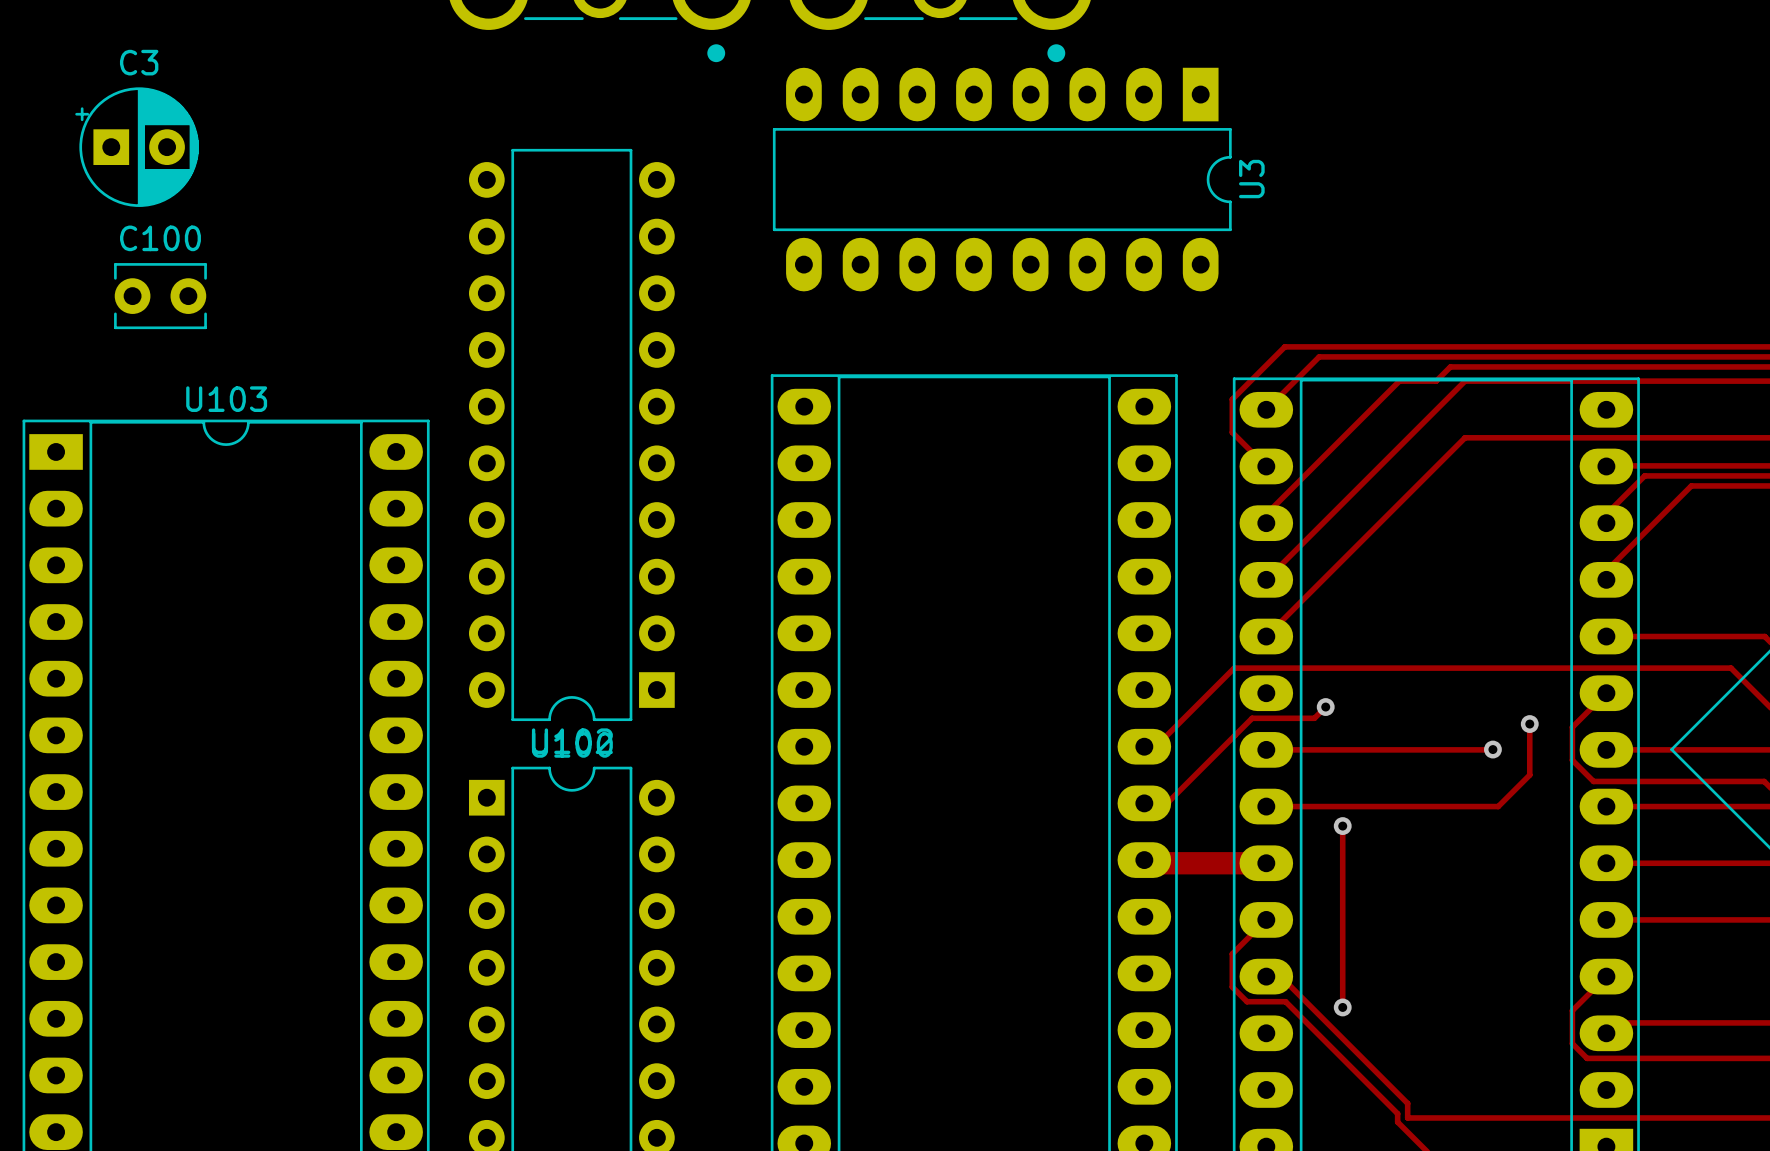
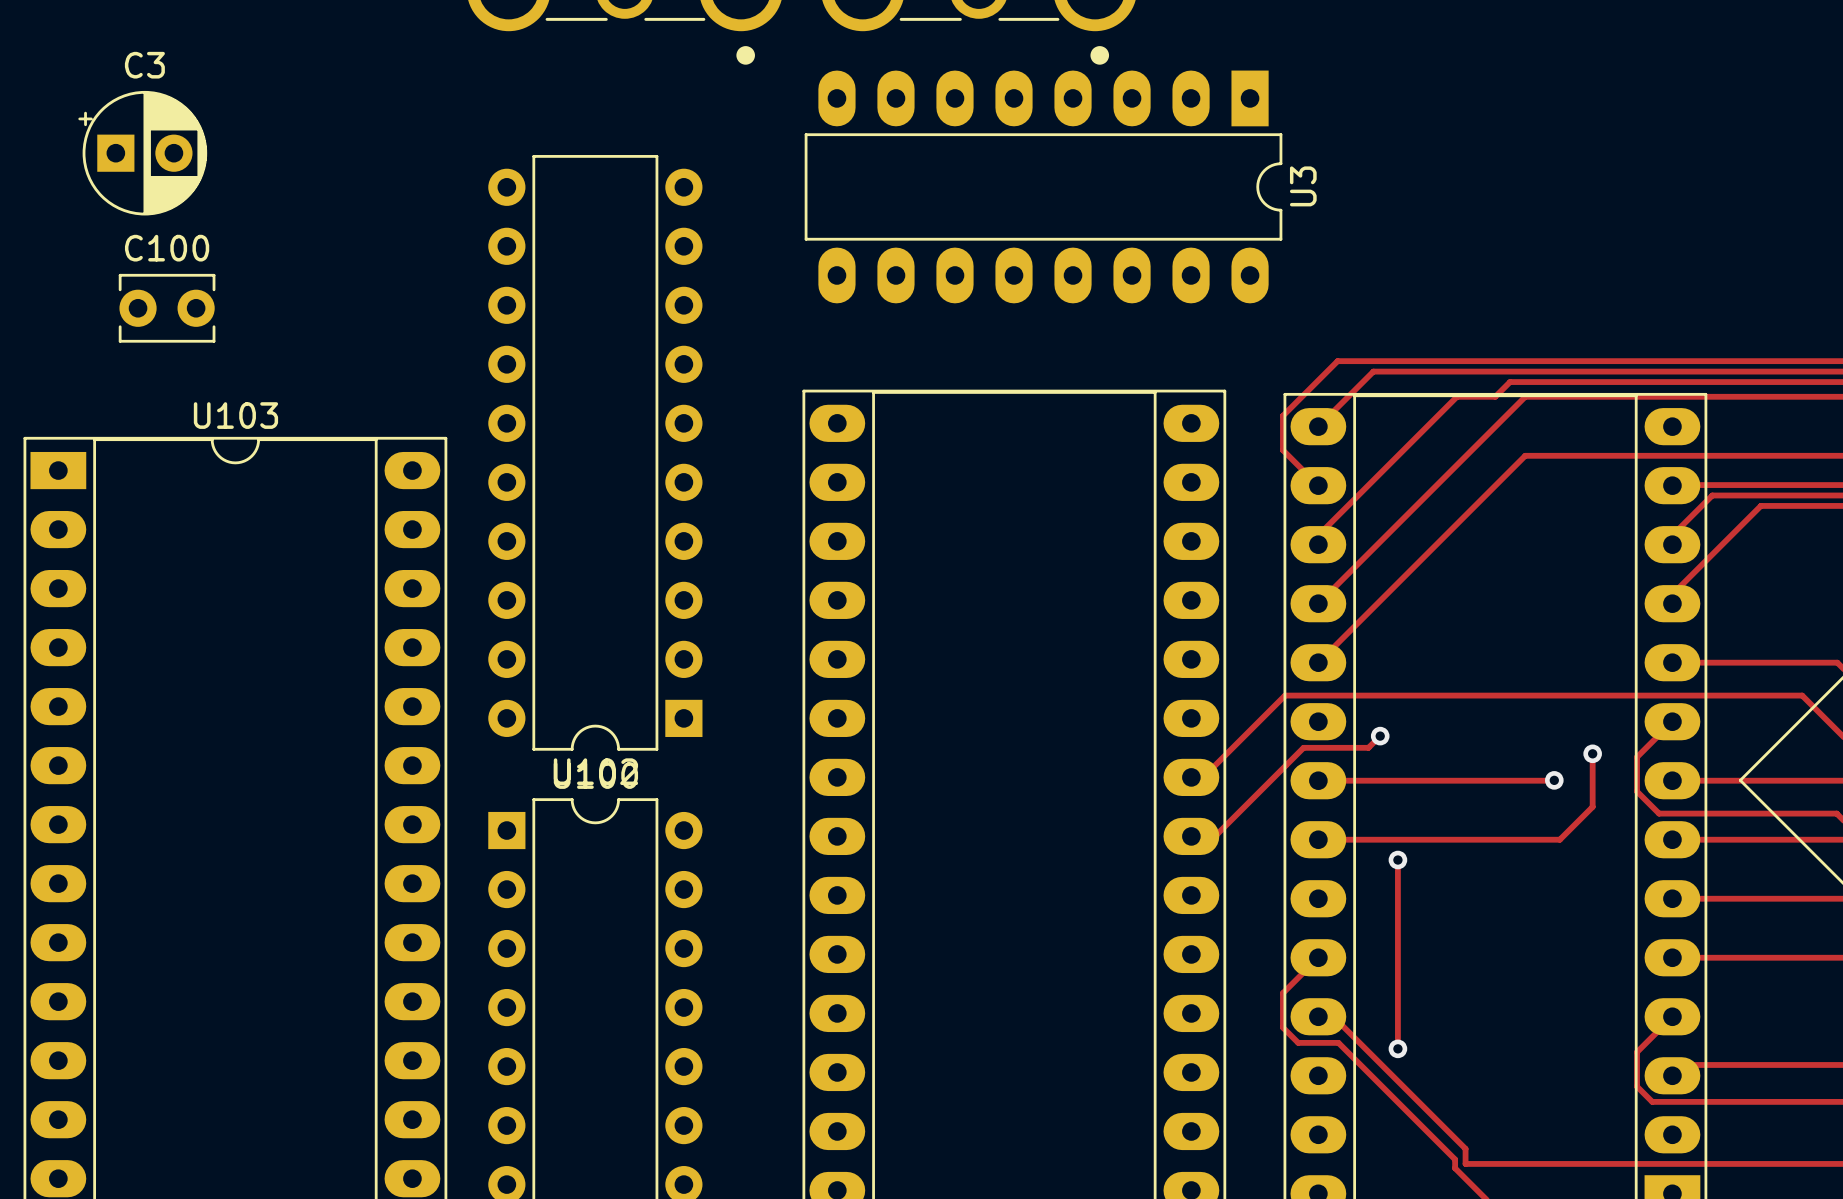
track: (1147, 863) (1266, 863) -> none

